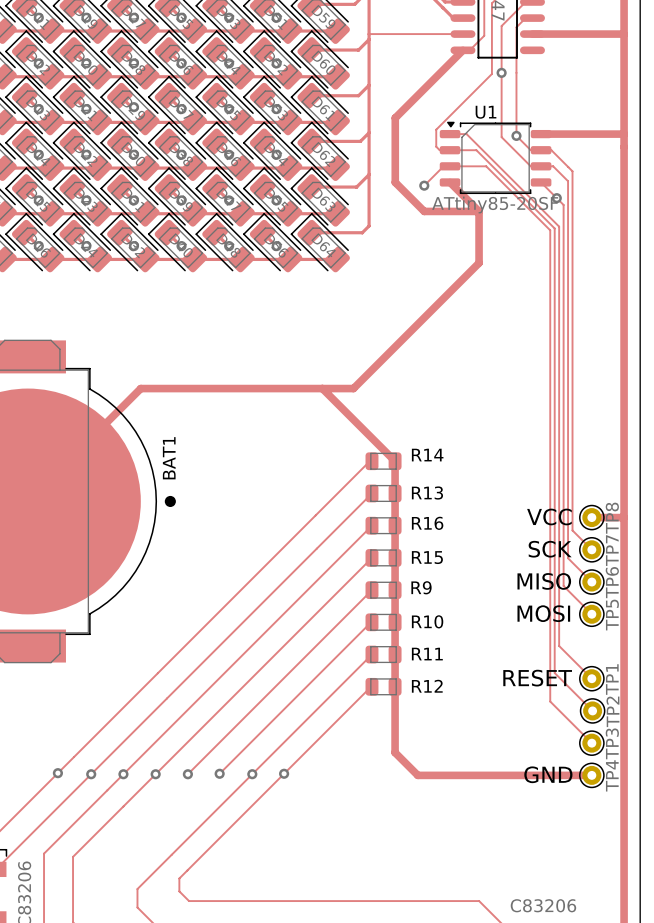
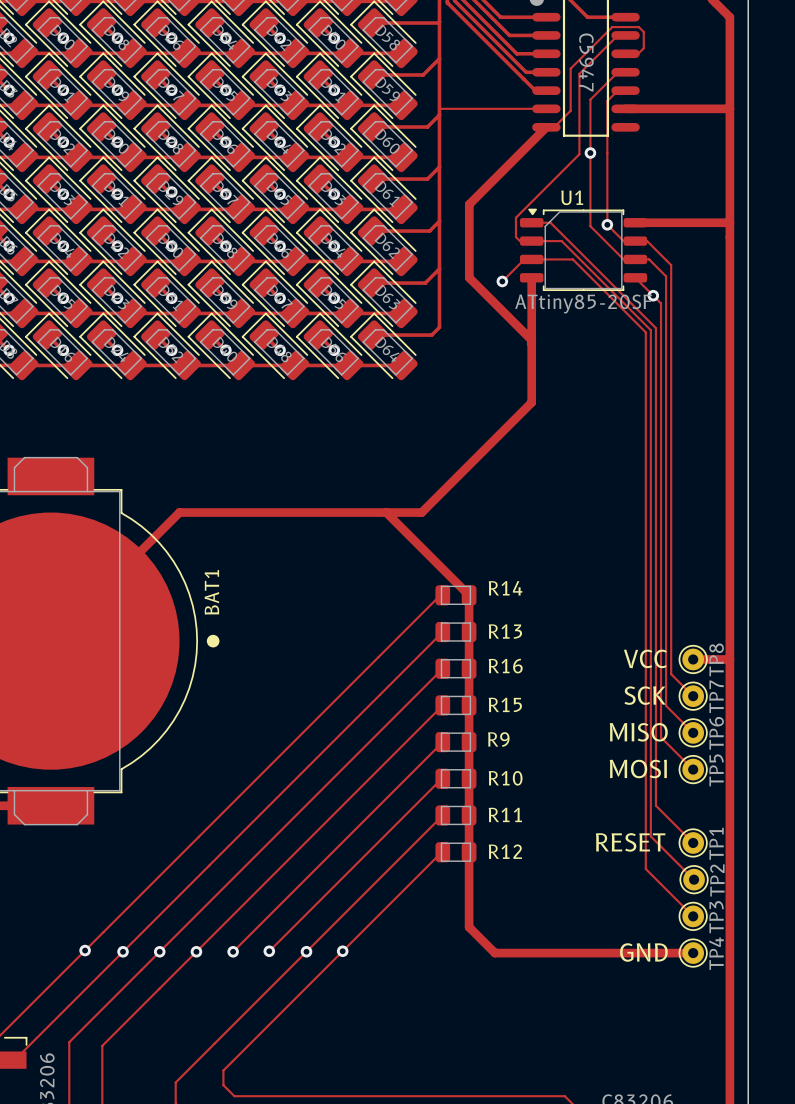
track: (450, 182) (479, 211) -> none
track: (424, 211) (479, 211) -> (502, 310) (531, 340)
track: (479, 211) (479, 263) (450, 292) -> (531, 277) (531, 402)

